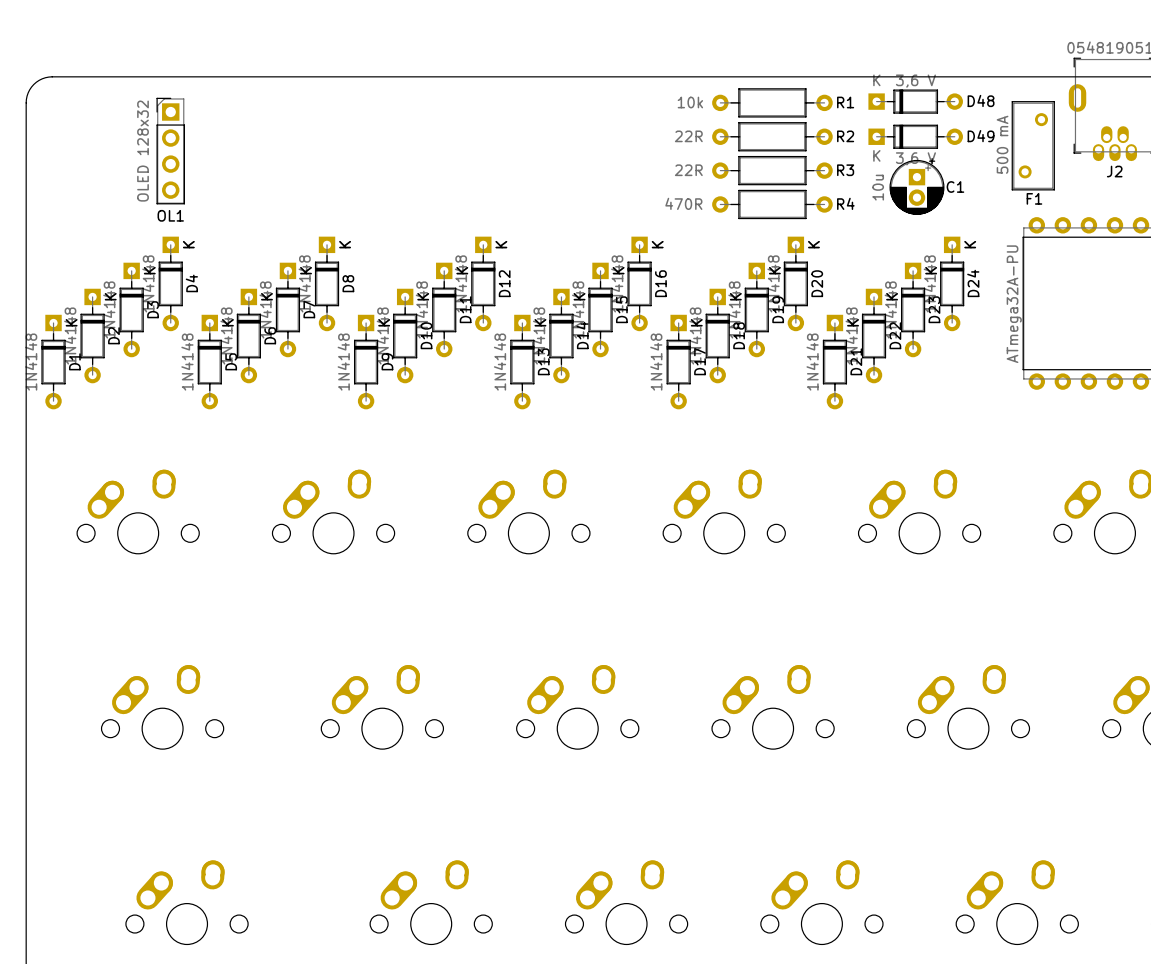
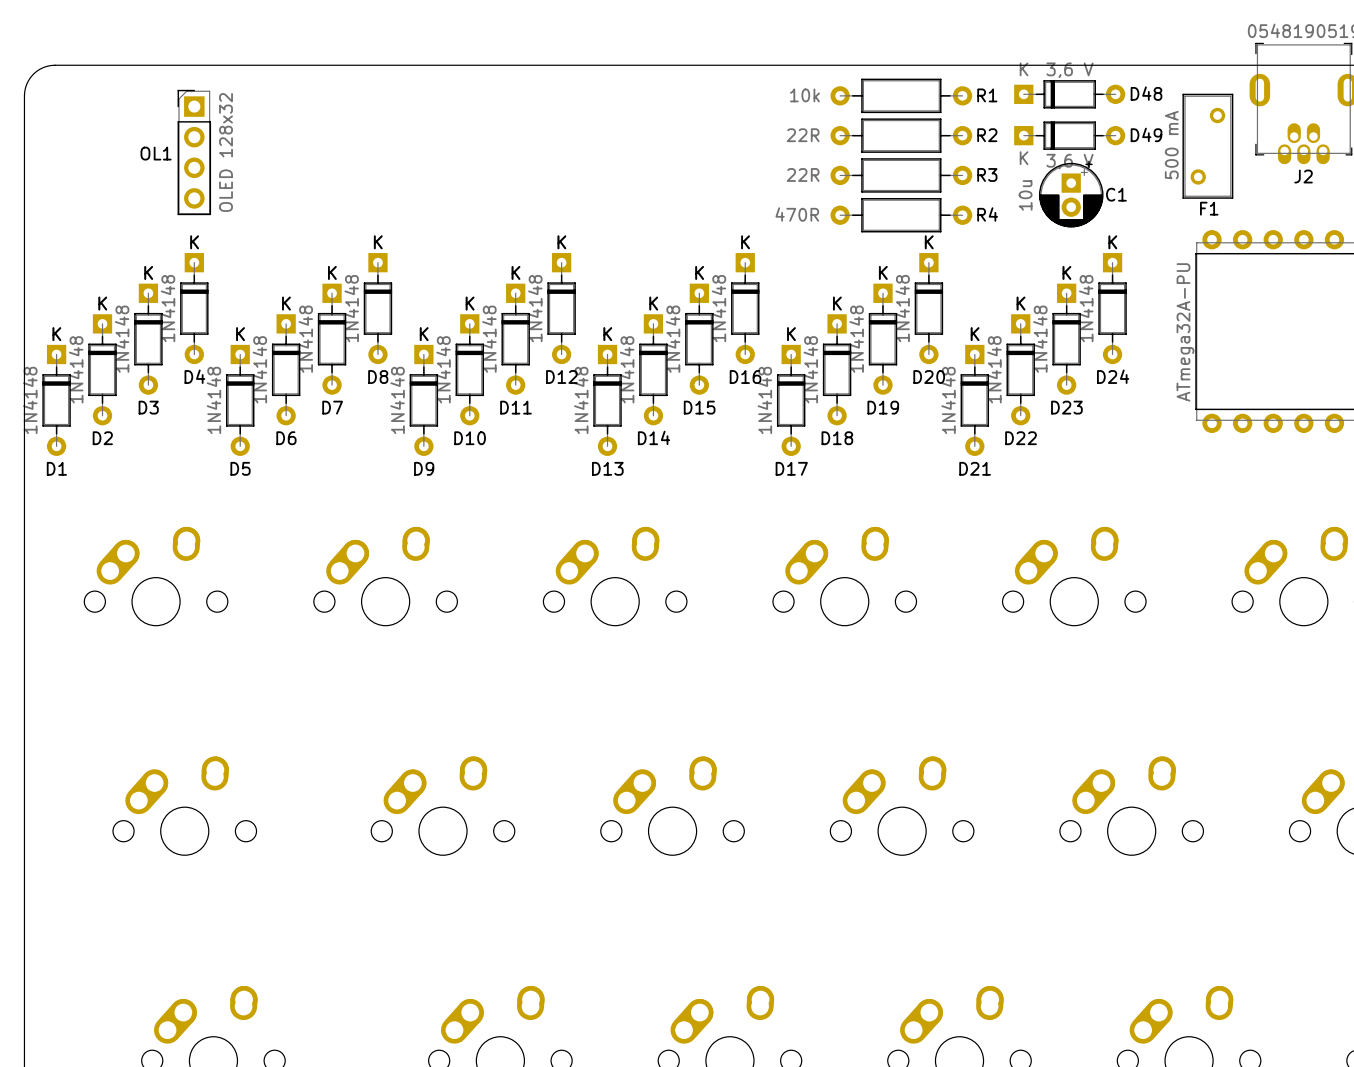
OL1 value position: OLED 128x32 (143, 151) -> OLED 128x32 (226, 152)
OL1 name position: OL1 (170, 215) -> OL1 (156, 153)
D4 footprint: [158, 236, 183, 332] -> [180, 253, 209, 365]
D8 footprint: [314, 236, 340, 332] -> [363, 253, 393, 365]
D12 footprint: [471, 236, 496, 332] -> [547, 253, 576, 365]
D16 footprint: [627, 236, 652, 332] -> [731, 253, 760, 365]
D20 footprint: [783, 236, 808, 332] -> [914, 253, 944, 365]
D24 footprint: [940, 236, 965, 332] -> [1098, 253, 1127, 365]
D3 footprint: [119, 262, 144, 358] -> [134, 283, 163, 395]
D7 footprint: [275, 262, 301, 358] -> [317, 283, 347, 395]
D11 footprint: [432, 262, 457, 358] -> [501, 283, 530, 395]
D15 footprint: [588, 262, 613, 358] -> [685, 283, 714, 395]
D19 footprint: [744, 262, 769, 358] -> [868, 283, 898, 395]
D23 footprint: [900, 262, 926, 358] -> [1052, 283, 1081, 395]
D4 name position: D4 (191, 283) -> D4 (194, 376)
D8 name position: D8 (348, 283) -> D8 (378, 377)
D12 name position: D12 (504, 283) -> D12 (561, 377)
D16 name position: D16 (660, 283) -> D16 (745, 377)
D20 name position: D20 (817, 283) -> D20 (929, 377)
D24 name position: D24 (973, 283) -> D24 (1113, 376)
D2 footprint: [80, 288, 105, 384] -> [88, 314, 117, 426]
D6 footprint: [236, 288, 261, 384] -> [271, 314, 301, 426]
D10 footprint: [393, 288, 418, 384] -> [455, 314, 485, 426]
D14 footprint: [549, 288, 574, 384] -> [639, 314, 668, 426]
D18 footprint: [705, 288, 730, 384] -> [822, 314, 852, 426]
D22 footprint: [861, 288, 887, 384] -> [1006, 314, 1035, 426]
D3 name position: D3 (153, 309) -> D3 (148, 407)
D7 name position: D7 (309, 309) -> D7 (332, 407)
D11 name position: D11 (465, 309) -> D11 (515, 407)
D15 name position: D15 (621, 309) -> D15 (699, 407)
D19 name position: D19 (778, 309) -> D19 (883, 407)
D23 name position: D23 (934, 309) -> D23 (1066, 407)
D1 footprint: [41, 314, 66, 410] -> [42, 344, 71, 456]
D5 footprint: [197, 314, 222, 410] -> [226, 344, 255, 456]
D9 footprint: [353, 314, 379, 410] -> [409, 344, 439, 456]
D13 footprint: [510, 314, 535, 410] -> [593, 344, 622, 456]
D17 footprint: [666, 314, 691, 410] -> [776, 344, 806, 456]
D21 footprint: [822, 314, 848, 410] -> [960, 344, 990, 456]
D2 name position: D2 (113, 335) -> D2 (102, 438)
D6 name position: D6 (270, 335) -> D6 (286, 438)
D10 name position: D10 (426, 335) -> D10 (470, 438)
D14 name position: D14 (582, 335) -> D14 (654, 437)
D18 name position: D18 (739, 335) -> D18 (837, 438)
D22 name position: D22 (895, 335) -> D22 (1021, 438)
D1 name position: D1 (74, 361) -> D1 (56, 468)
D5 name position: D5 (231, 361) -> D5 (240, 468)
D9 name position: D9 (387, 361) -> D9 (424, 468)
D13 name position: D13 (543, 361) -> D13 (607, 468)
D17 name position: D17 (700, 361) -> D17 (791, 468)
D21 name position: D21 (856, 361) -> D21 (975, 468)

